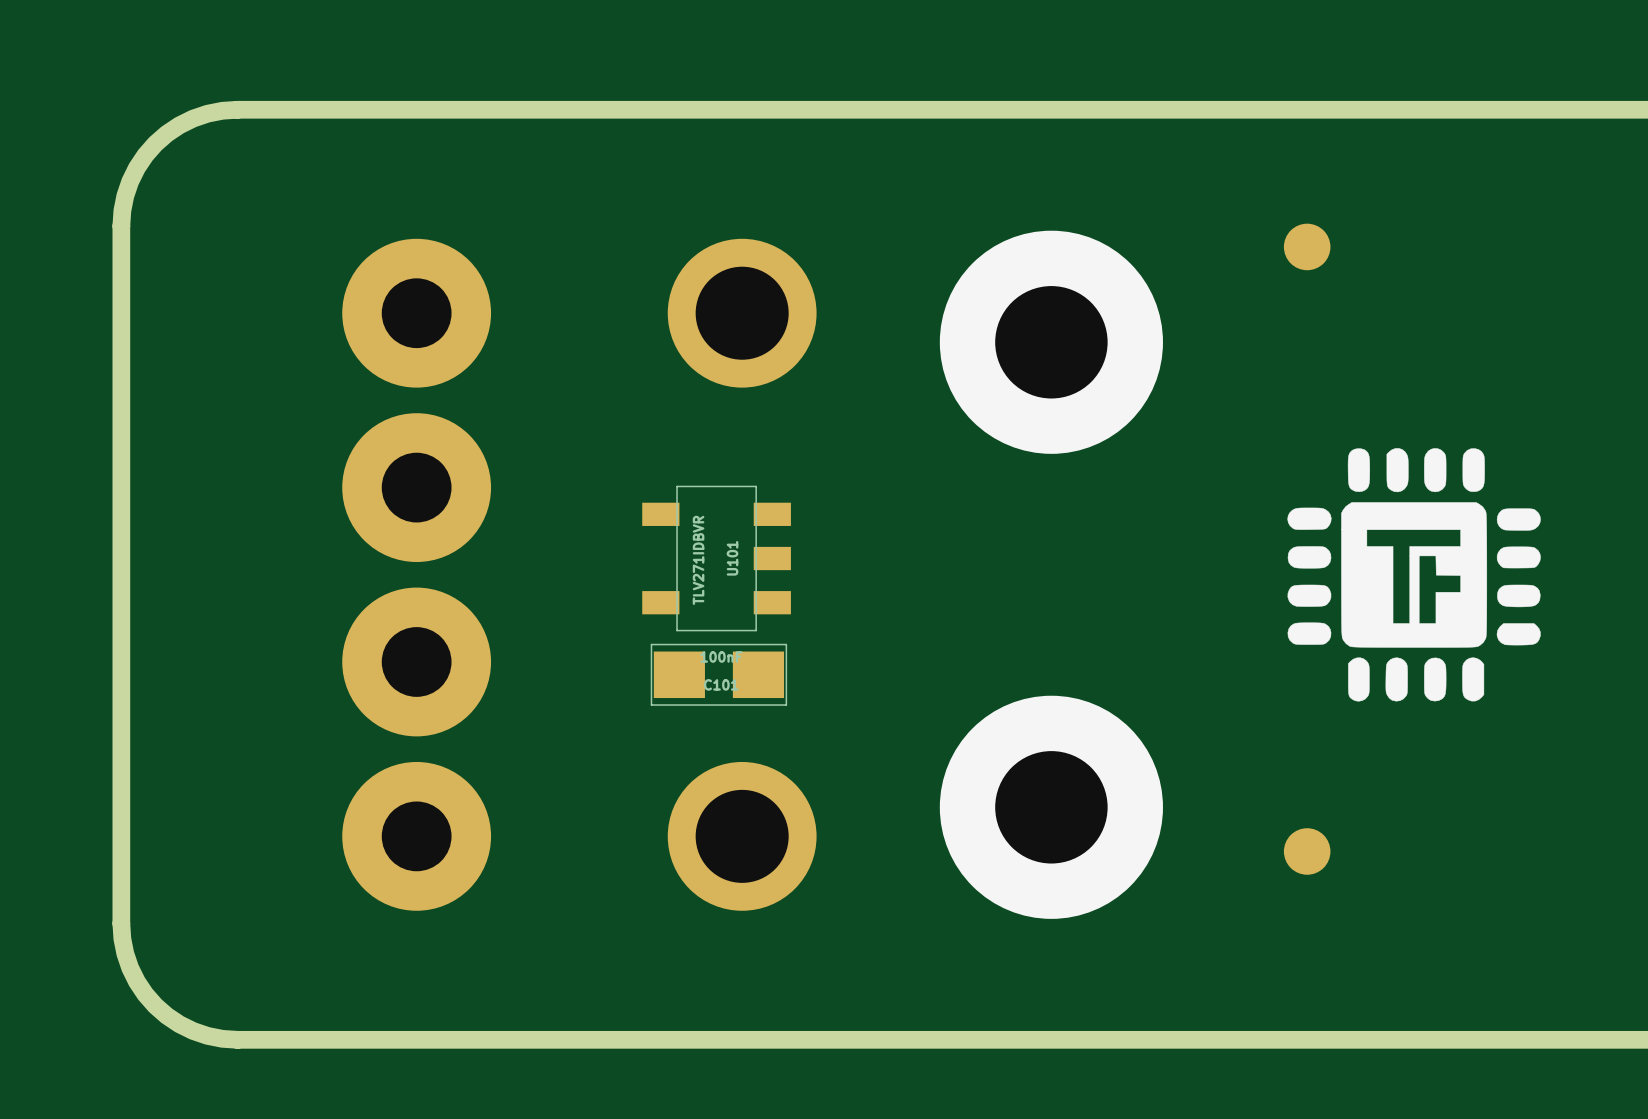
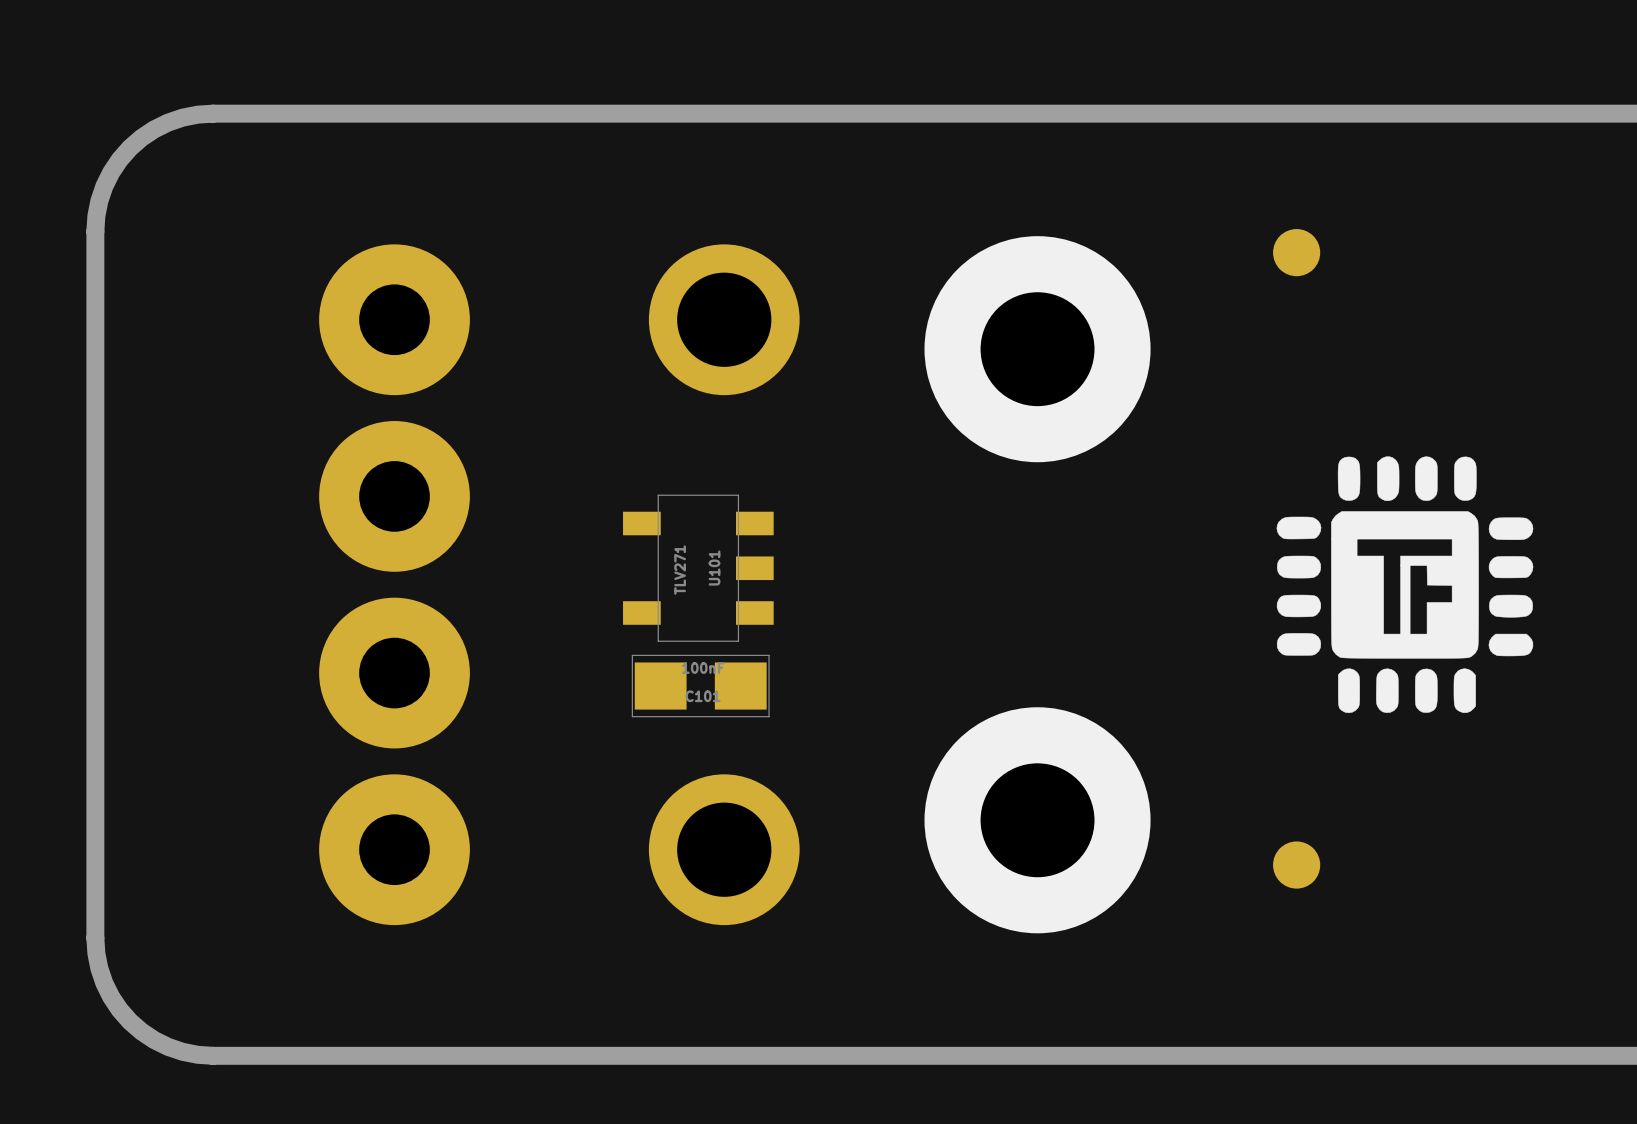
U101 value: TLV271IDBVR (698, 560) -> TLV271 (680, 570)

